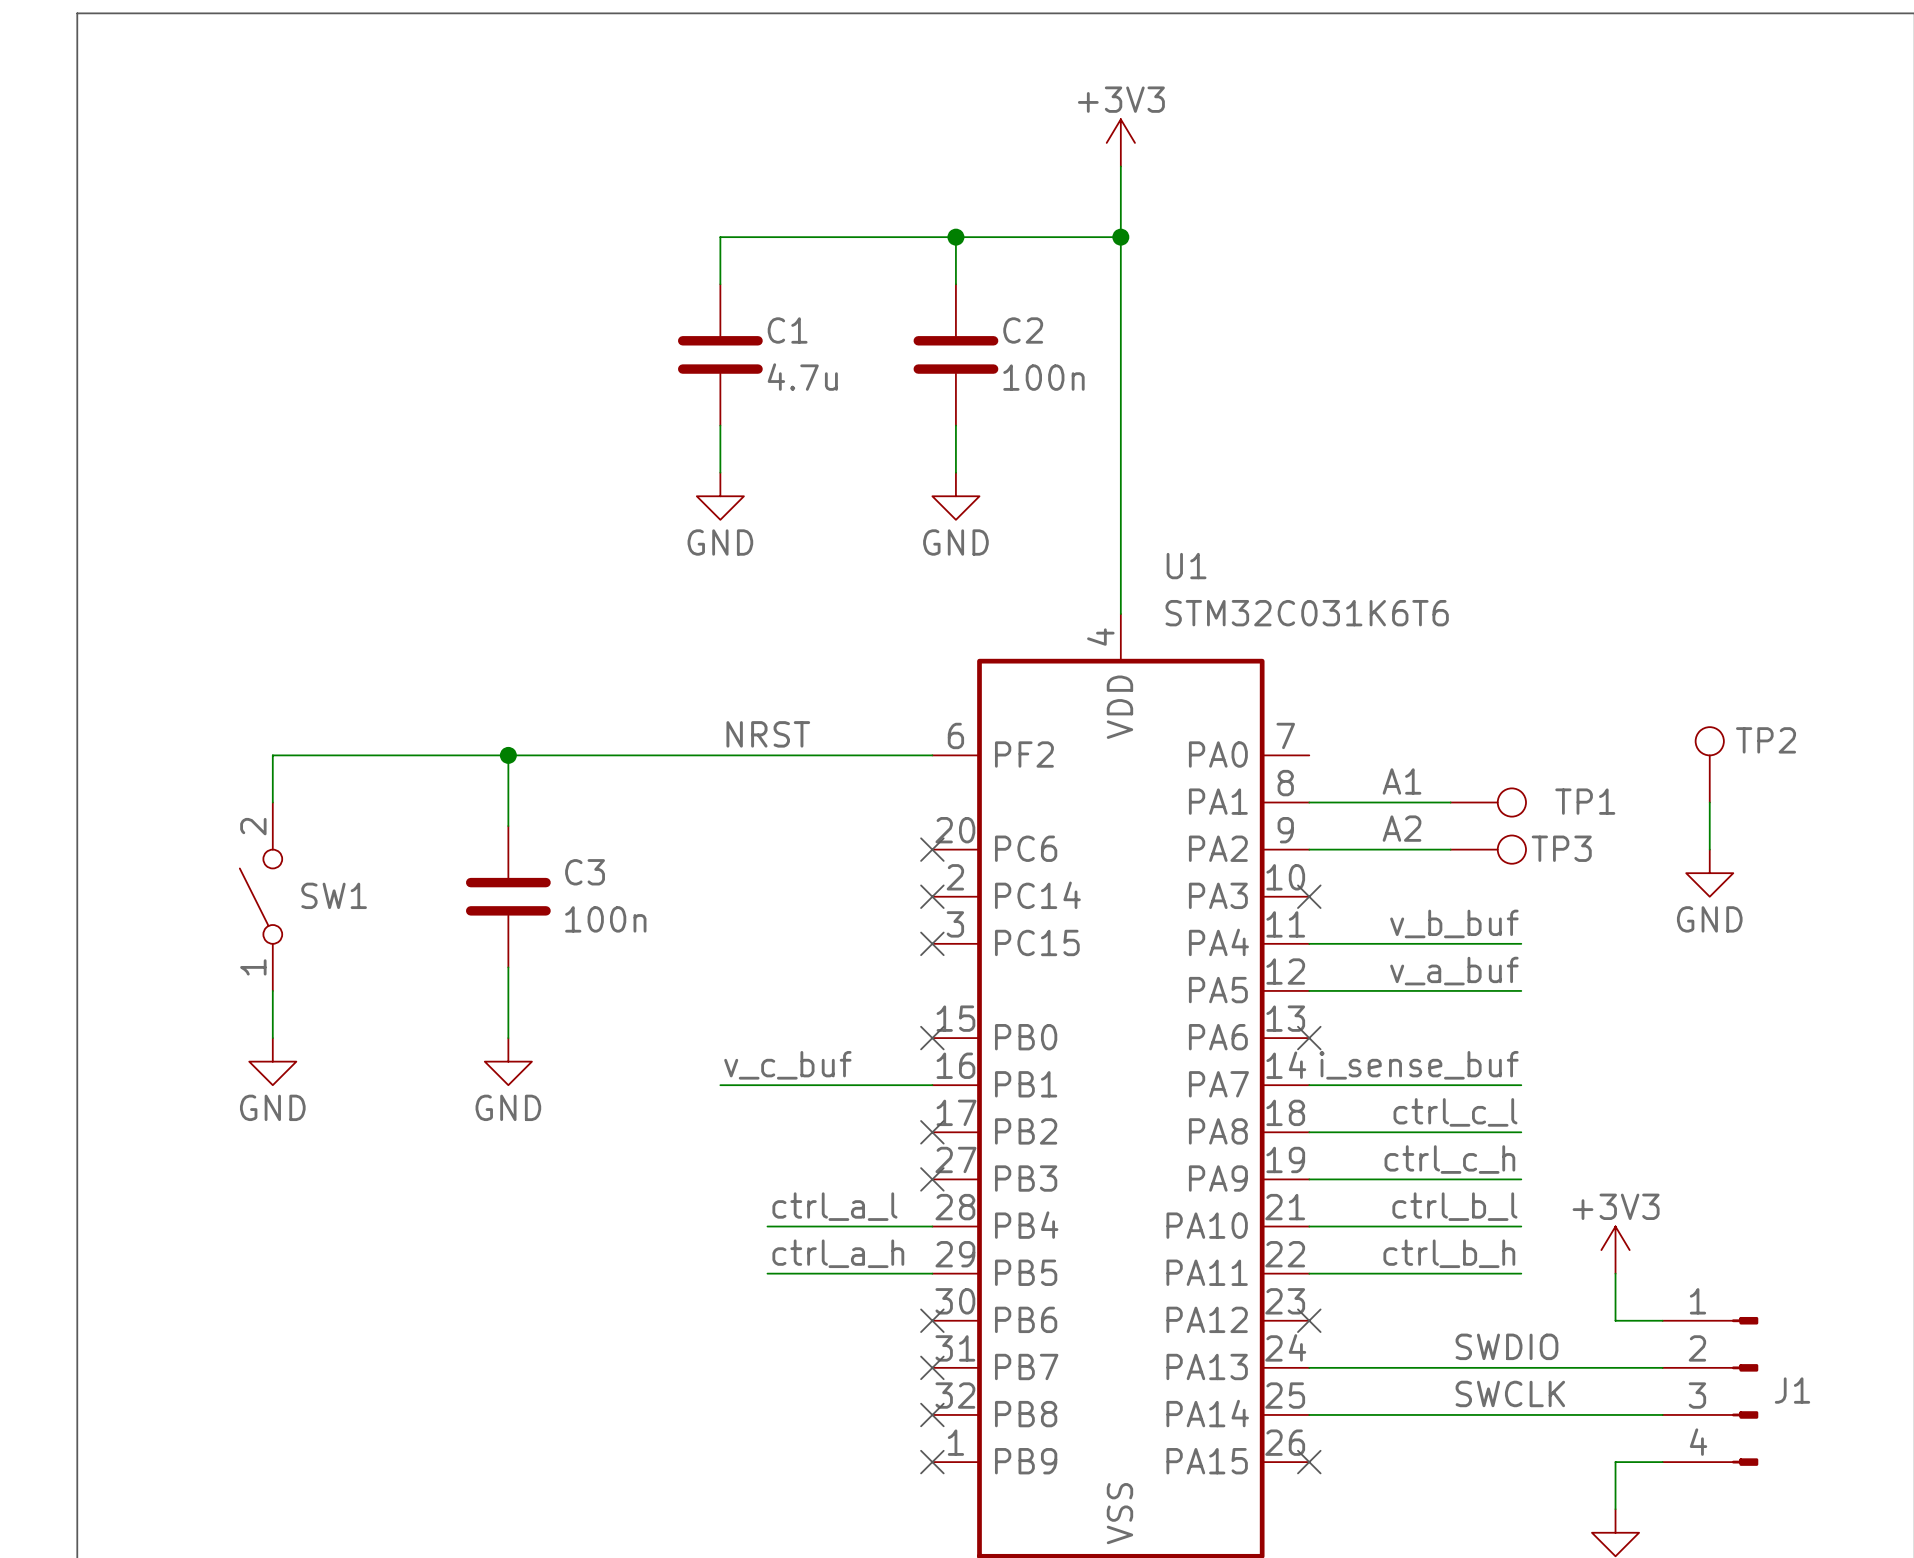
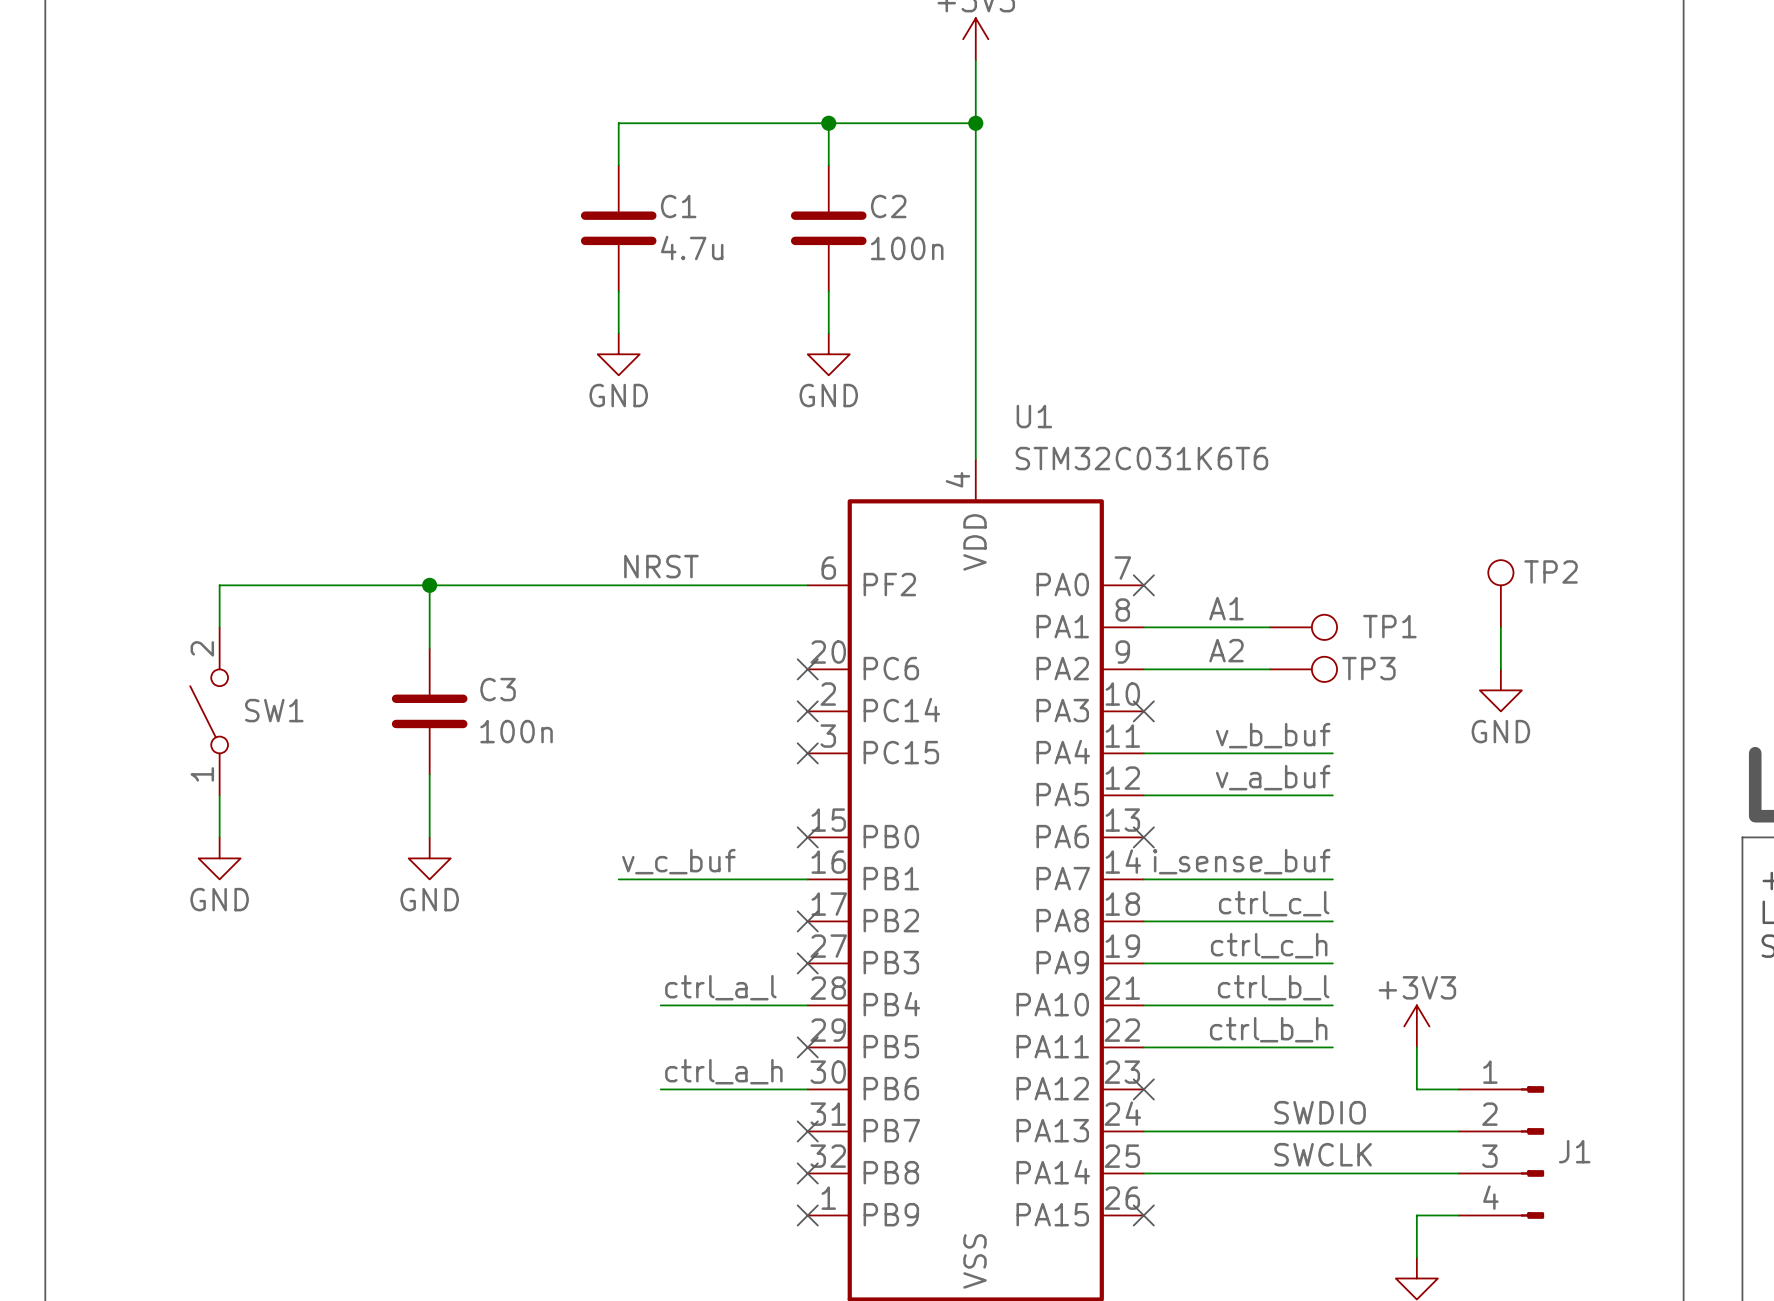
no-connect mark: none -> (1143, 585)
label position: ctrl_a_h (838, 1253) -> ctrl_a_h (723, 1071)
wire: (767, 1273) (932, 1273) -> (660, 1089) (807, 1089)
no-connect mark position: (932, 1320) -> (807, 1047)

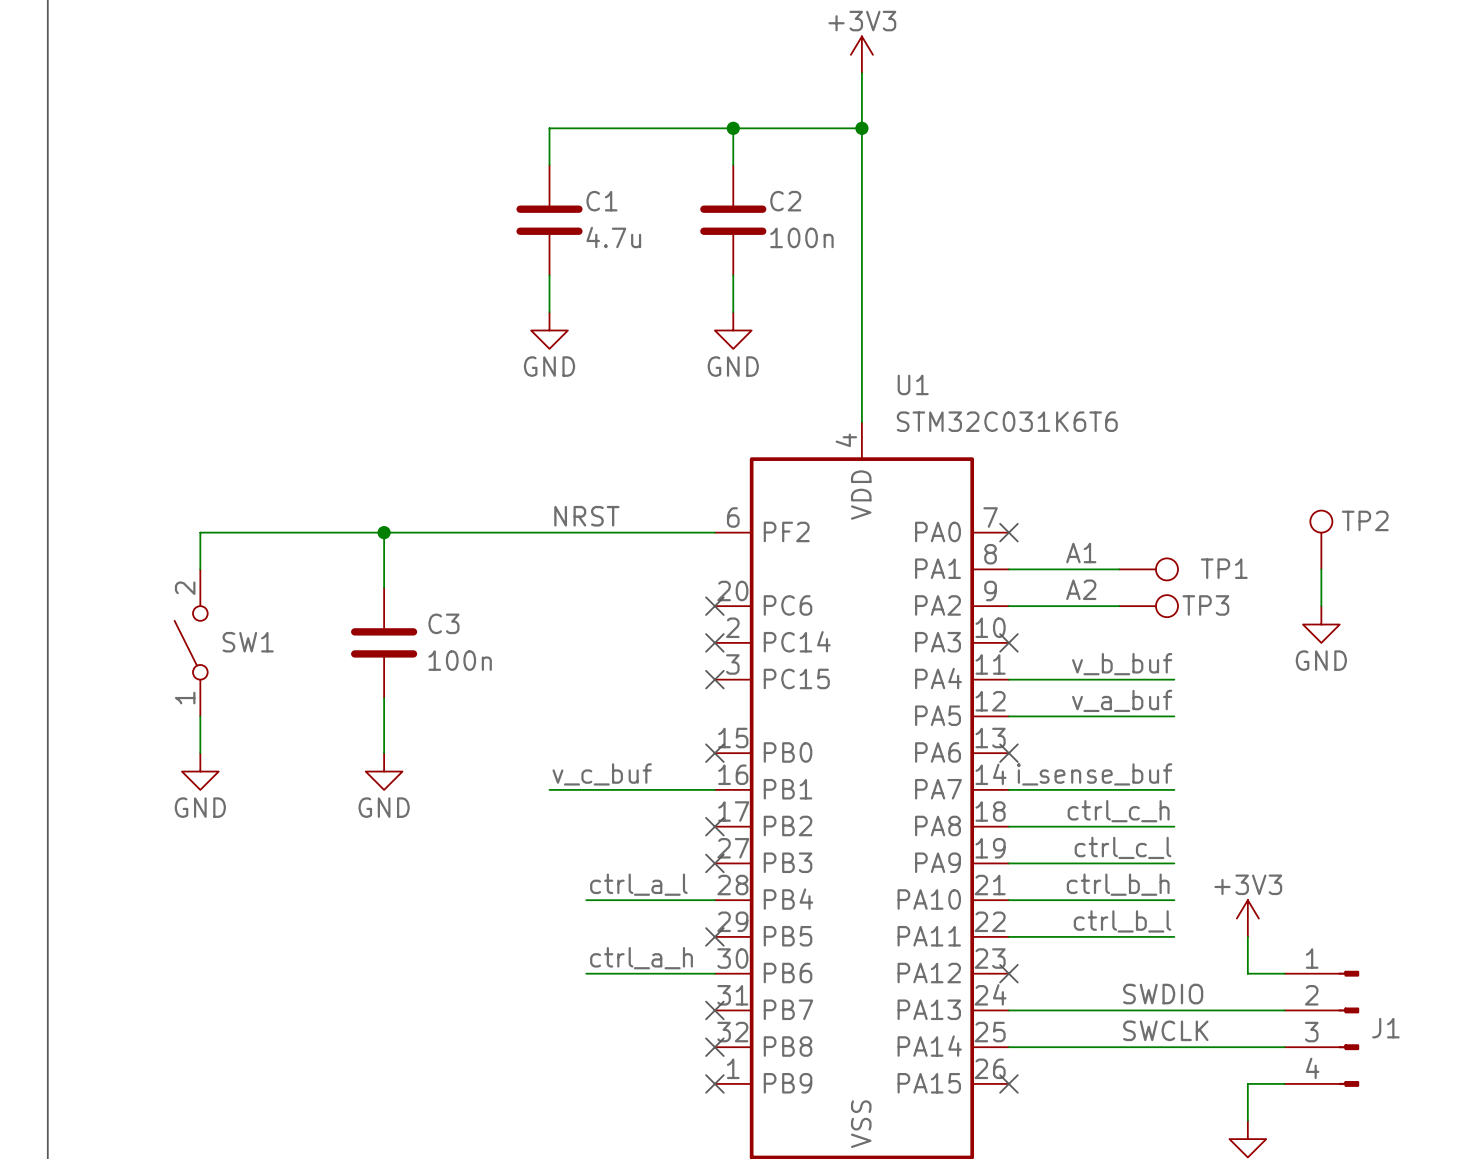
label: ctrl_c_l (1274, 903) -> ctrl_c_h (1118, 811)
label: ctrl_c_h (1269, 945) -> ctrl_c_l (1123, 847)
label: ctrl_b_l (1273, 987) -> ctrl_b_h (1118, 884)
label: ctrl_b_h (1268, 1029) -> ctrl_b_l (1122, 921)

